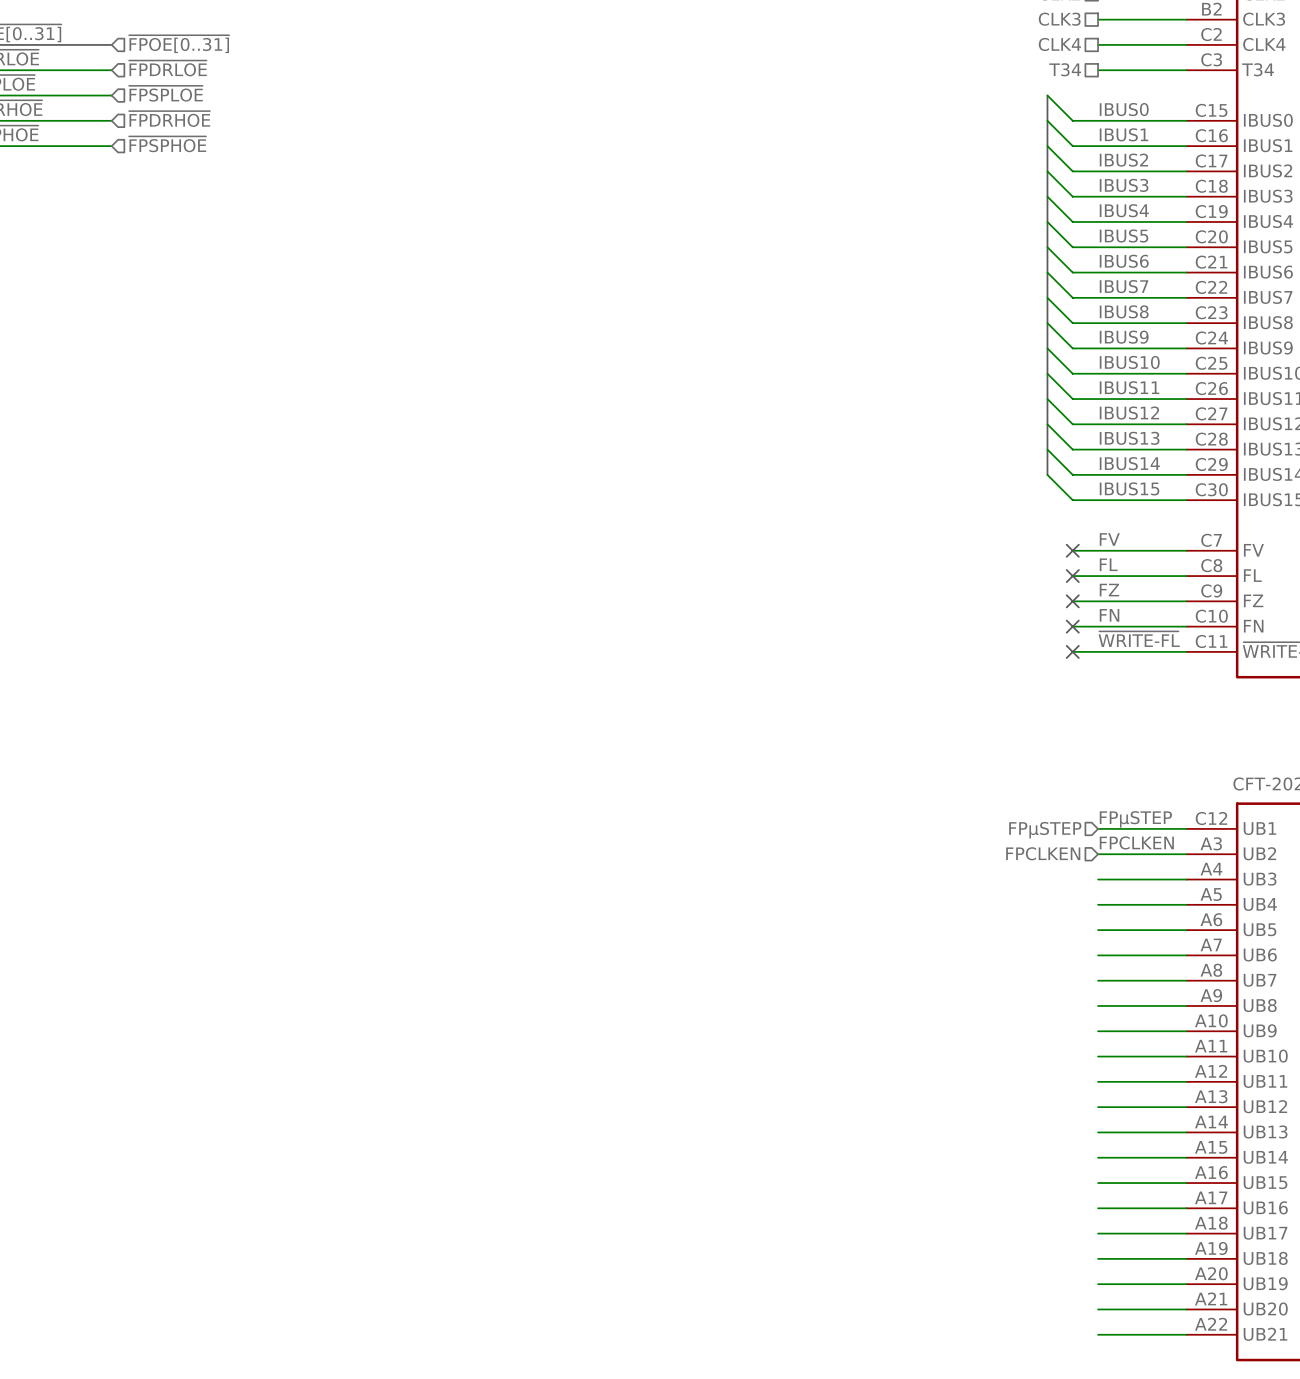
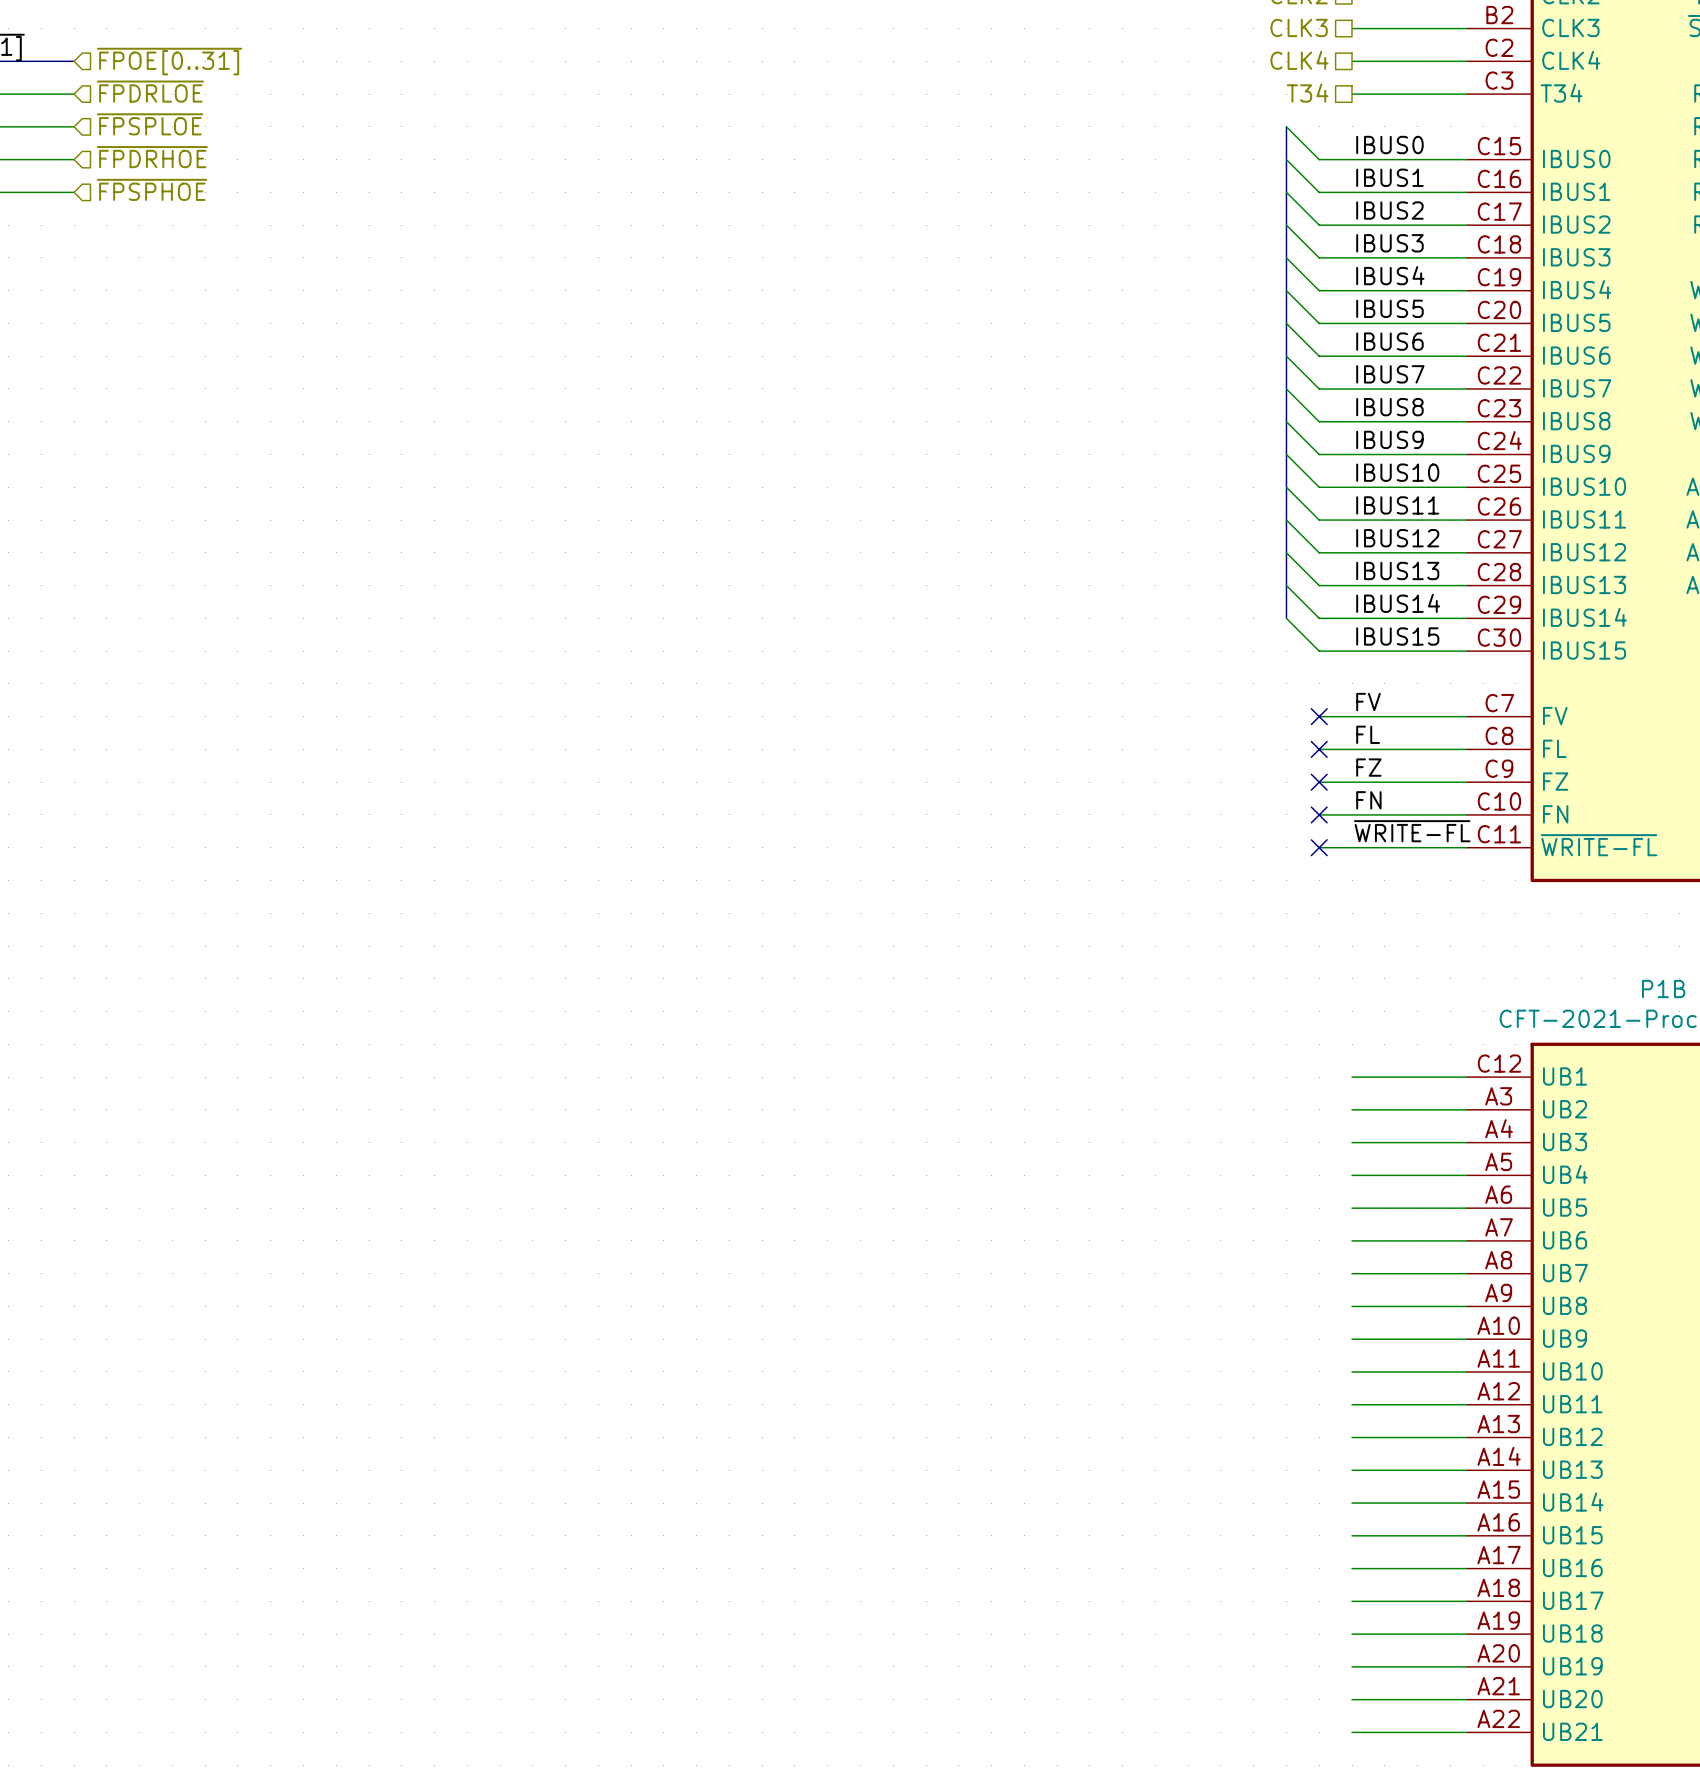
label: FPµSTEP (1135, 819) -> none
hierarchical label: FPµSTEP (1045, 830) -> none
label: FPCLKEN (1136, 842) -> none
hierarchical label: FPCLKEN (1043, 853) -> none

